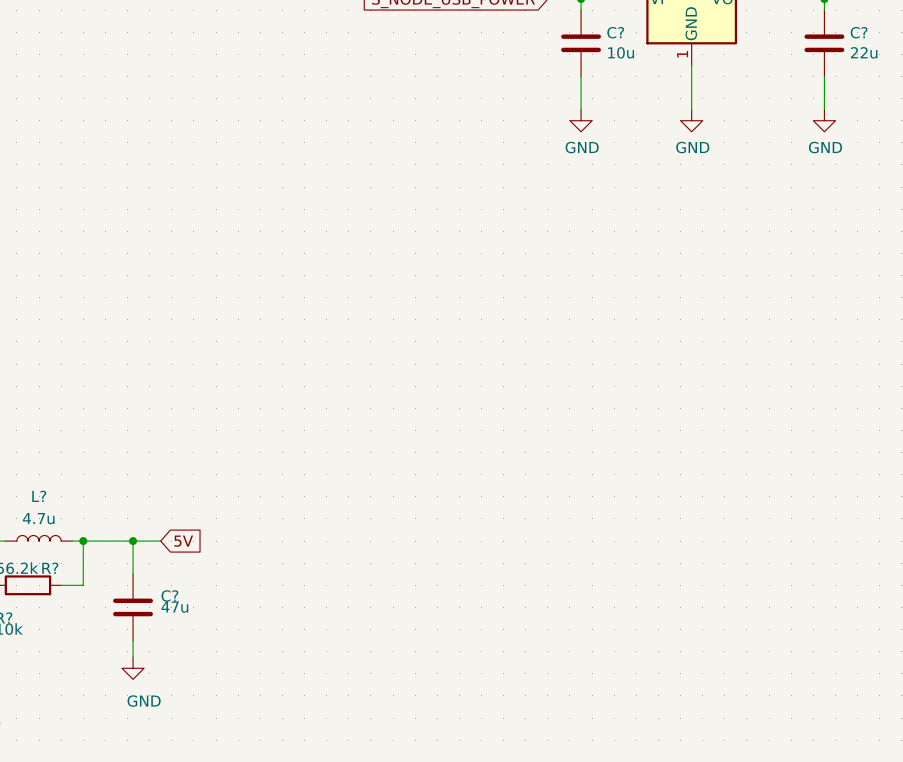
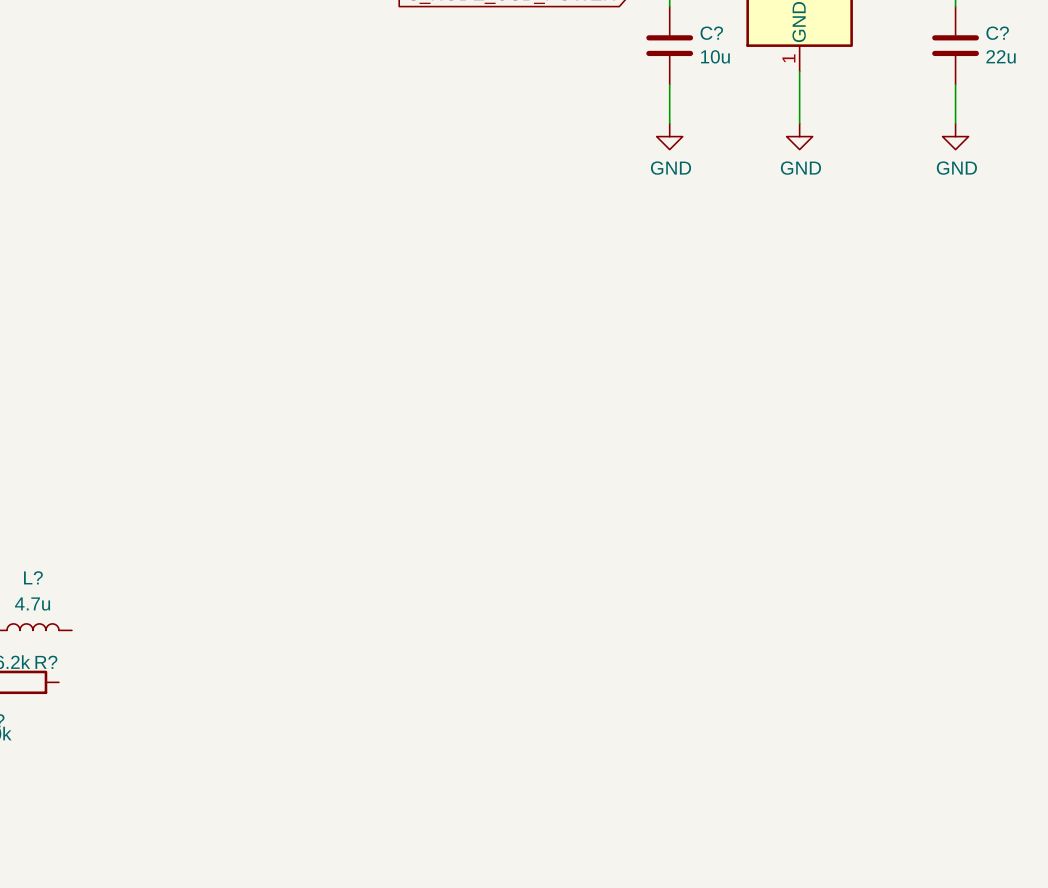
wire: (72, 541) (160, 541) -> none
wire: (83, 541) (83, 585) (61, 585) -> none
junction: (83, 541) -> none
wire: (133, 541) (133, 574) -> none
junction: (133, 541) -> none
global label: 5V (183, 541) -> none
C?: 47u (133, 607) -> none
wire: (133, 640) (133, 657) -> none
power symbol: GND (133, 668) -> none

